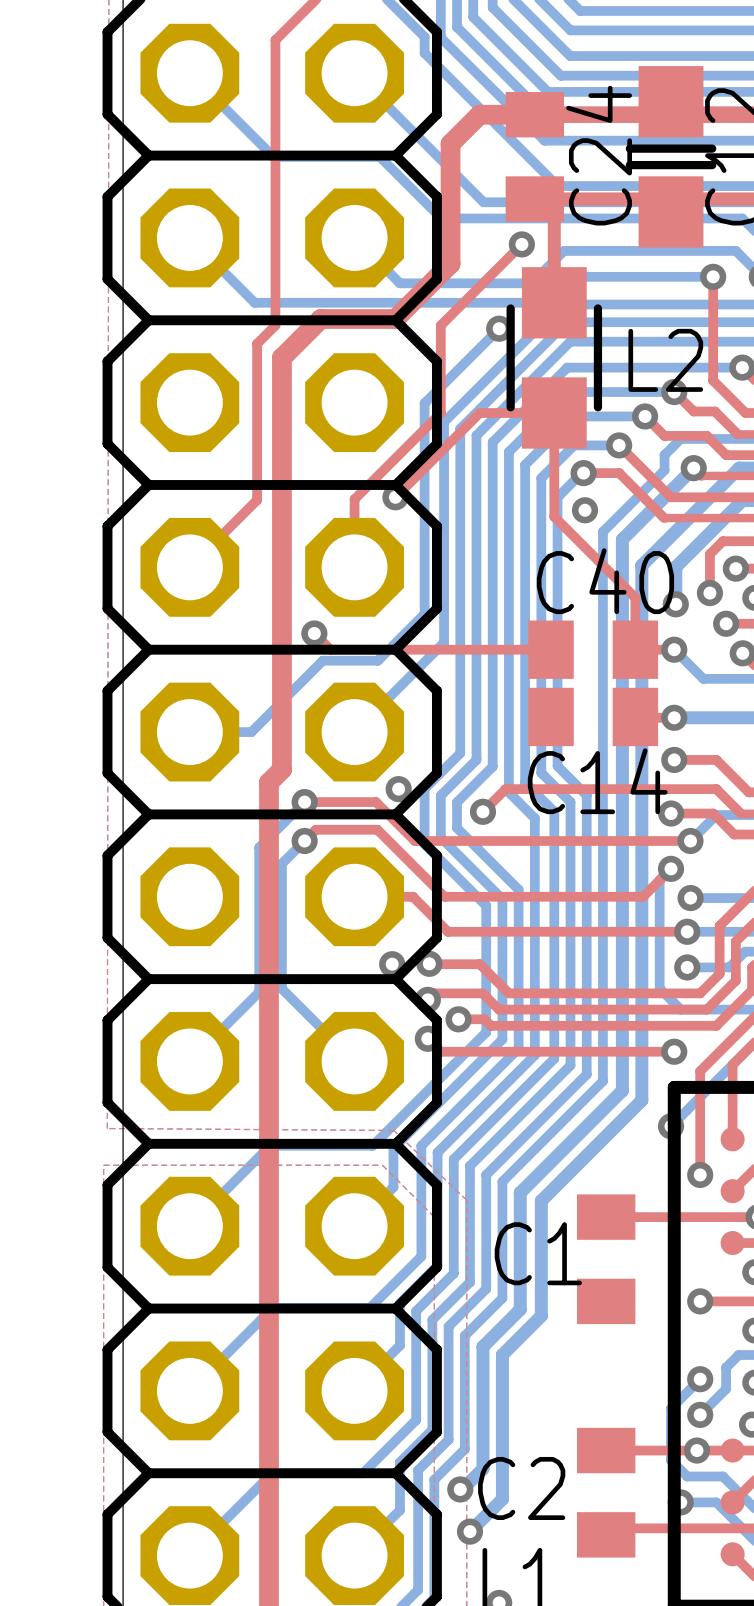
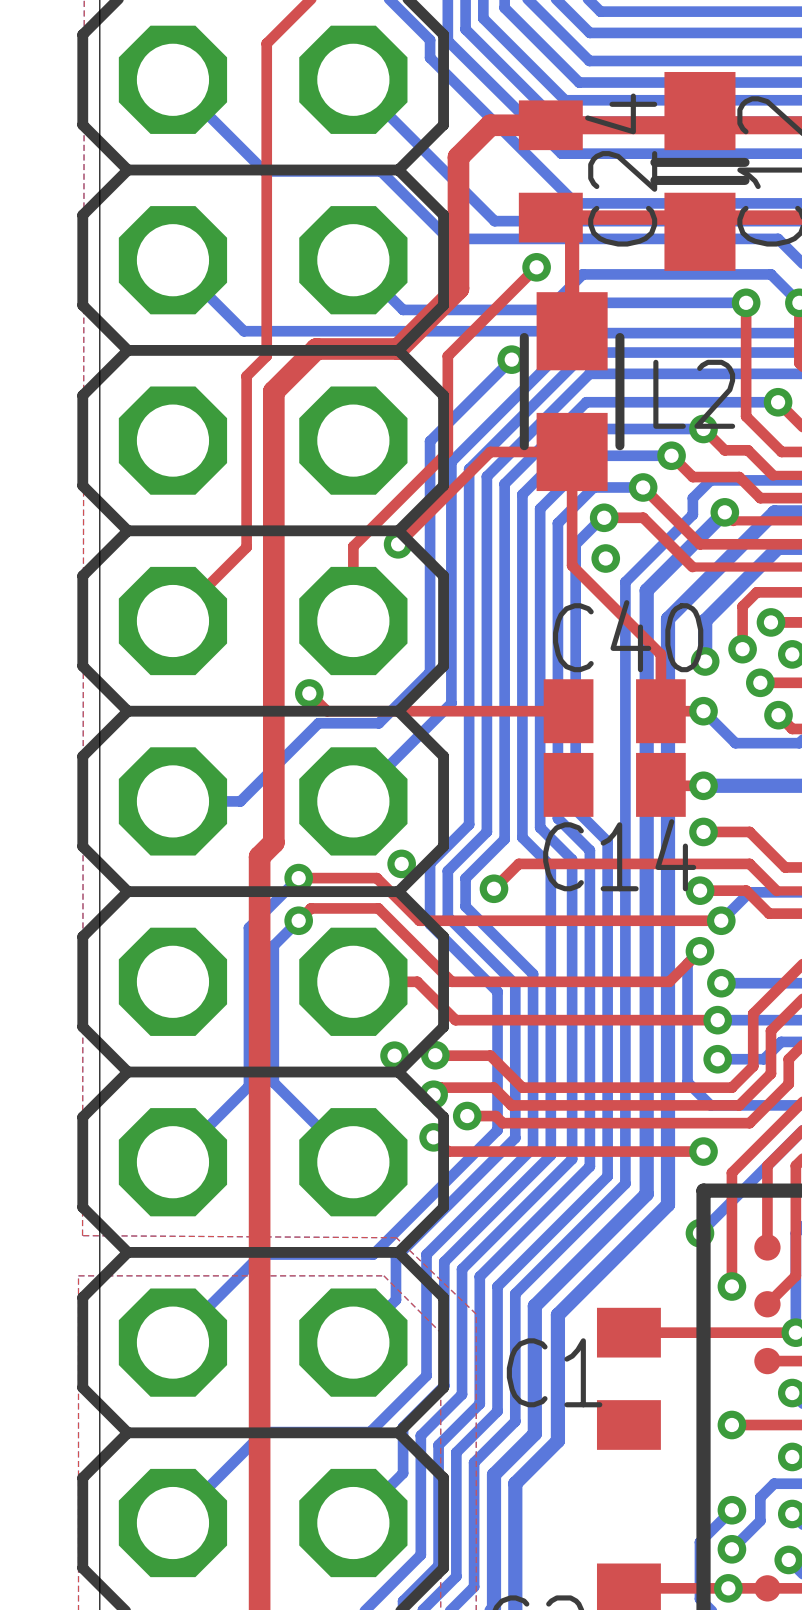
bottom track: (557, 739) (557, 766) (586, 795) -> (575, 809) (607, 841) (607, 870)
bottom track: (541, 747) (541, 772) (570, 802) -> (557, 818) (589, 850) (589, 878)
bottom track: (525, 756) (525, 782) (554, 811) -> (540, 827) (572, 859) (572, 888)
bottom track: (508, 765) (508, 792) (534, 818) -> (522, 837) (550, 866) (550, 895)

